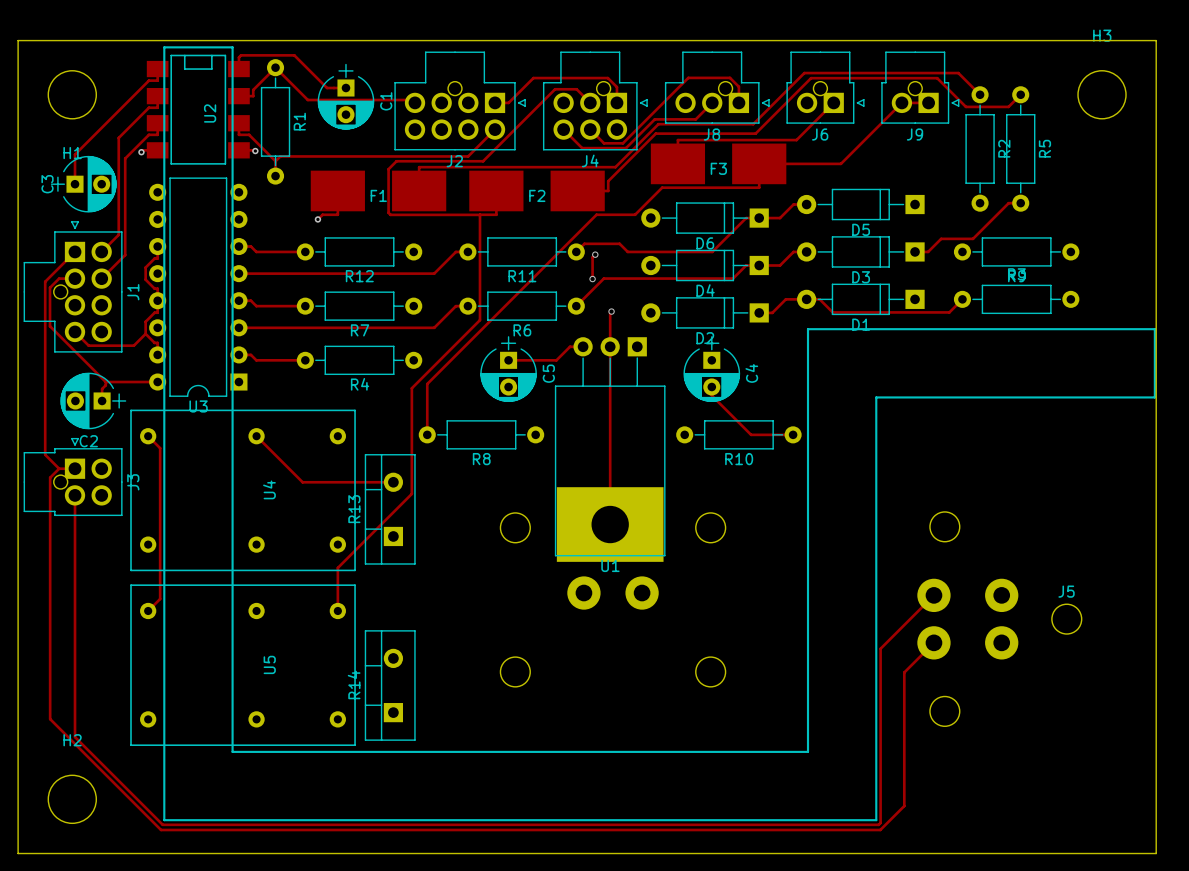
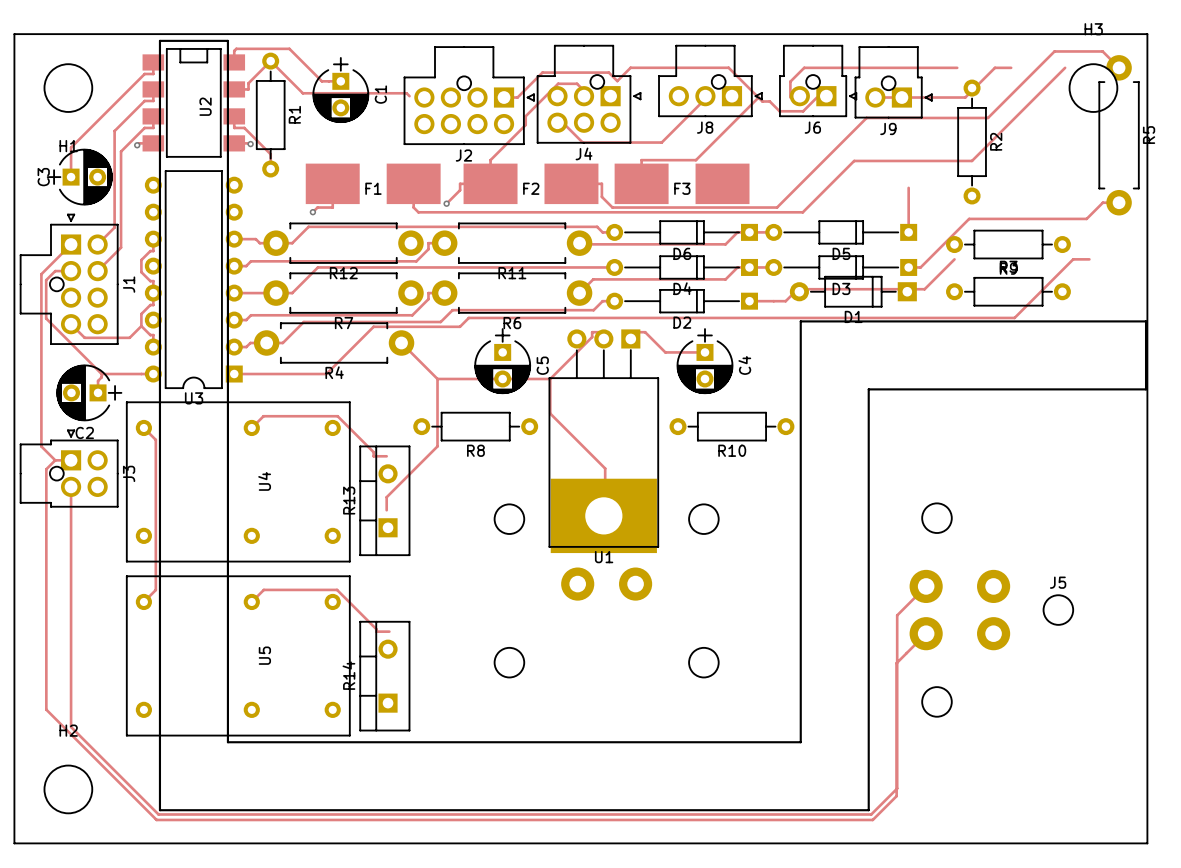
track: none -> (957, 67) (804, 67) (790, 81) (790, 97)
track: none -> (1011, 67) (994, 67) (965, 97) (875, 97)
R5 footprint: [1006, 86, 1036, 212] -> [1098, 55, 1140, 216]
J9 position: (920, 87) -> (893, 82)
track: (980, 94) (958, 73) (804, 73) (753, 124) (658, 124) (615, 167) (419, 167) (419, 190) -> (1065, 67) (972, 160) (854, 160) (802, 212) (418, 212) (413, 207) (413, 183)
track: (1020, 94) (1008, 106) (965, 106) (937, 78) (811, 78) (755, 133) (655, 133) (608, 181) (608, 190) -> none
J2 position: (460, 100) -> (469, 95)
track: (495, 102) (508, 102) (533, 78) (607, 78) (616, 87) (616, 102) -> none
track: (590, 102) (576, 89) (555, 89) (483, 161) (396, 161) (388, 169) (388, 212) (390, 214) (479, 214) (479, 320) (411, 388) (411, 493) (337, 567) (337, 610) -> none
track: (712, 102) (695, 119) (654, 119) (626, 148) (582, 148) (563, 129) -> none
track: (738, 102) (738, 86) (730, 77) (688, 77) (622, 143) (604, 143) (590, 129) -> none
track: (833, 102) (796, 140) (677, 140) (677, 163) -> none
track: (928, 102) (901, 102) (840, 163) (759, 163) (759, 187) (662, 187) (635, 214) -> (1119, 67) (1102, 51) (1054, 51) (988, 117) (866, 117) (777, 207) (628, 207)
track: none -> (504, 97) (517, 97) (542, 72) (608, 72) (617, 81) (630, 67) (728, 67) (758, 97)
track: none -> (590, 97) (577, 83) (558, 83) (525, 116) (525, 124) (490, 160) (490, 183) (460, 183) (460, 190) (446, 203)
track: none -> (706, 97) (661, 142) (582, 142) (564, 124)
track: none -> (758, 97) (762, 101) (769, 101) (779, 111) (803, 111) (816, 97)
track: none -> (758, 97) (695, 160) (641, 160) (641, 183)
track: (495, 129) (468, 156) (280, 156) (275, 161) -> none
F3 position: (718, 163) -> (682, 183)
D5 footprint: [797, 188, 925, 221] -> [765, 220, 918, 245]
track: (496, 190) (496, 214) (480, 214) -> none
track: none -> (908, 187) (908, 232)
D6 footprint: [641, 202, 769, 234] -> [606, 220, 759, 245]
track: (1020, 203) (1008, 203) (973, 238) (941, 238) (928, 251) (915, 251) -> none
track: (806, 204) (793, 204) (780, 218) (746, 218) (712, 251) (627, 251) (619, 243) (584, 243) (576, 251) -> none
track: none -> (1119, 202) (1102, 202) (1086, 218) (969, 218) (920, 267) (908, 267)
via: none -> (446, 203)
track: (618, 214) (596, 214) (427, 384) (427, 434) -> (612, 207) (601, 196) (601, 183)
D3 footprint: [797, 236, 925, 268] -> [765, 255, 918, 280]
R12 footprint: [296, 237, 423, 267] -> [263, 222, 424, 264]
R11 footprint: [459, 237, 585, 267] -> [431, 222, 593, 264]
track: none -> (773, 232) (737, 232) (725, 244) (579, 243)
track: (250, 246) (256, 251) (305, 251) -> (246, 239) (255, 239) (259, 243) (292, 243) (308, 226) (597, 226) (602, 232) (614, 232)
D4 footprint: [641, 249, 769, 282] -> [606, 255, 759, 280]
track: (467, 251) (455, 251) (434, 273) (250, 273) -> (444, 243) (428, 243) (428, 249) (416, 261) (251, 261) (246, 266)
track: (806, 251) (793, 251) (780, 265) (746, 265) (733, 278) (603, 278) (576, 306) -> none
track: (595, 254) (592, 257) (592, 279) -> none
via: (595, 254) -> none
track: none -> (954, 259) (924, 289) (797, 289) (785, 301) (749, 301)
track: none -> (1089, 259) (1073, 259) (1014, 317) (468, 317) (459, 326) (373, 326) (326, 374) (234, 374)
track: none -> (773, 267) (737, 267) (725, 279) (593, 279) (579, 293)
via: (592, 279) -> none
R7 footprint: [296, 291, 423, 321] -> [263, 272, 424, 314]
R6 footprint: [459, 291, 585, 321] -> [431, 272, 593, 314]
D2 footprint: [641, 297, 769, 329] -> [606, 289, 759, 314]
track: (962, 299) (949, 312) (832, 312) (819, 299) (785, 299) (772, 312) (759, 312) -> none
track: (250, 300) (256, 306) (305, 306) -> (246, 293) (292, 293) (317, 267) (614, 267)
track: (467, 306) (455, 306) (434, 327) (250, 327) -> (444, 293) (428, 293) (428, 299) (412, 315) (251, 315) (246, 320)
track: (611, 311) (610, 524) -> none
via: (611, 311) -> none
track: none -> (605, 332) (592, 332) (592, 337) (550, 378)
track: none -> (632, 332) (645, 332) (665, 352) (704, 352)
R4 footprint: [296, 345, 423, 375] -> [253, 322, 415, 364]
track: (583, 346) (570, 346) (556, 360) (508, 360) -> none
track: none -> (401, 342) (437, 378)
track: (250, 354) (256, 360) (305, 360) -> (246, 347) (250, 342) (282, 342) (303, 322) (440, 322) (452, 310) (593, 310) (602, 301) (614, 301)
track: none -> (437, 378) (437, 446) (386, 497) (386, 510)
track: none -> (437, 378) (550, 378)
track: none -> (550, 378) (550, 413) (605, 468) (605, 509)
track: (711, 387) (711, 395) (751, 434) (793, 434) -> none
track: (256, 436) (302, 482) (393, 482) -> (251, 427) (263, 416) (337, 416) (373, 452) (373, 456) (386, 456)
track: none -> (251, 601) (263, 589) (337, 589) (376, 629) (376, 631) (389, 631)
track: (904, 624) (880, 648) (880, 822) (878, 824) (162, 824) (75, 736) -> (897, 615) (897, 788) (871, 814) (158, 814) (71, 727)

